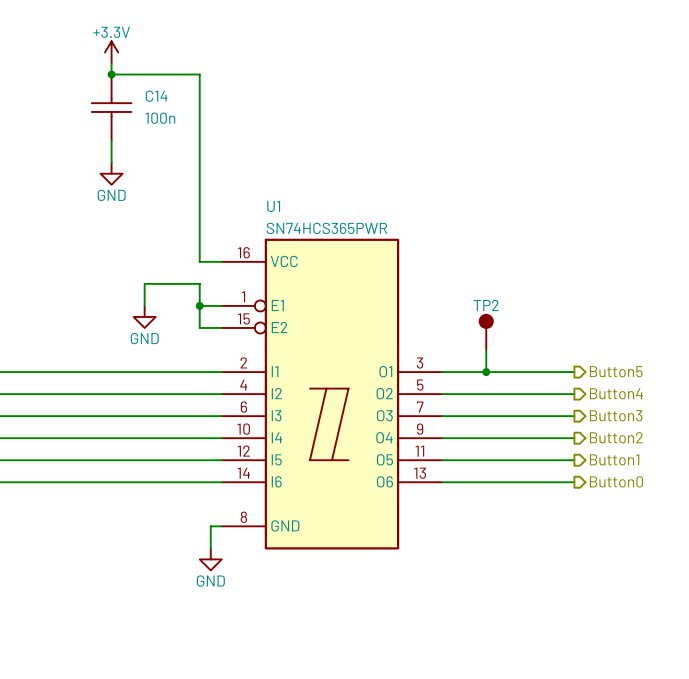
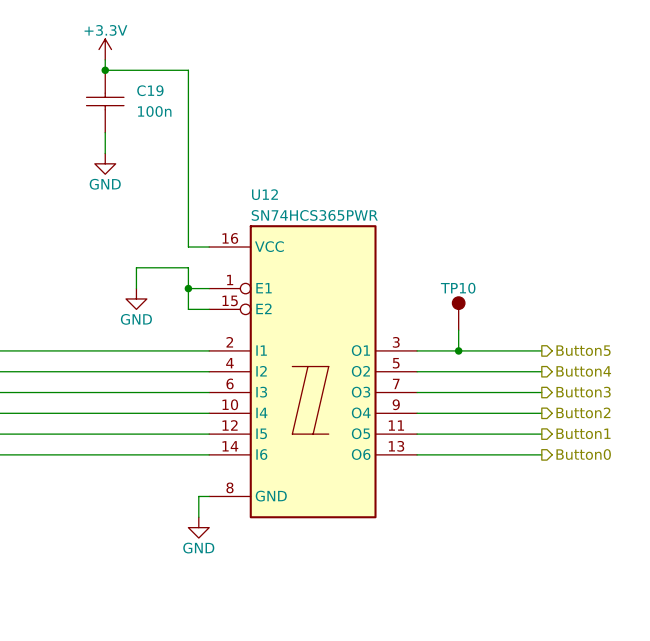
C14 name: C14 (156, 96) -> C19 (150, 90)
U1 name: U1 (273, 206) -> U12 (264, 194)
TP2 name: TP2 (486, 305) -> TP10 (458, 288)

